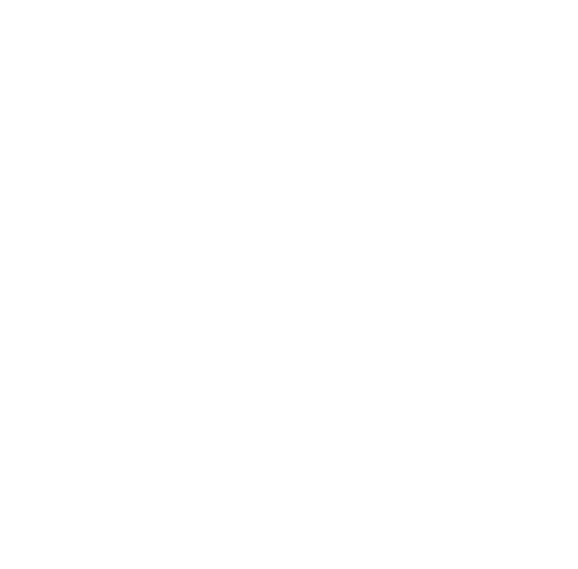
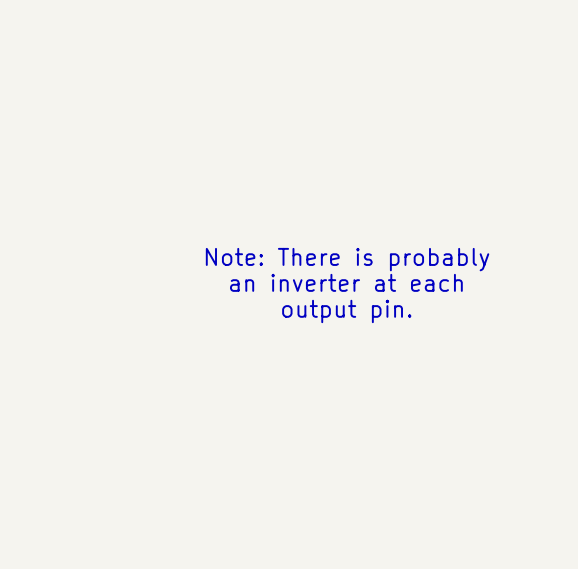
text: none -> Note: There is probably (347, 259)
text: none -> an inverter at each (346, 282)
text: none -> output pin. (346, 311)

